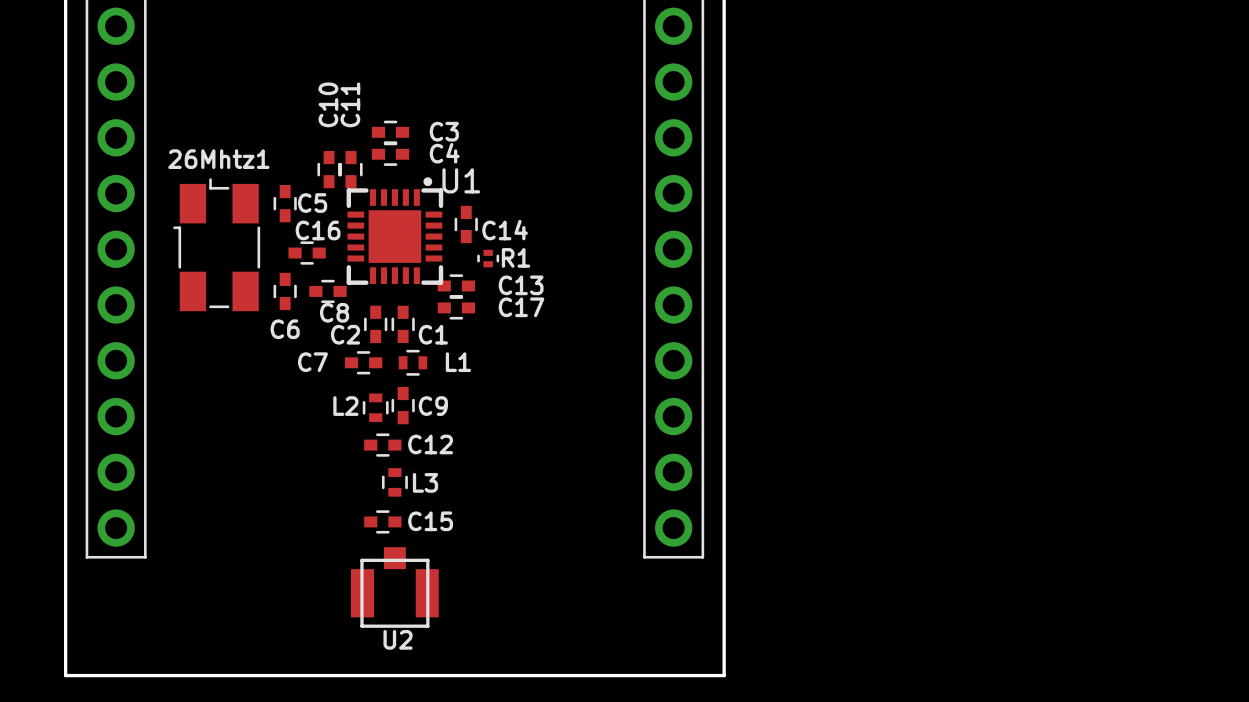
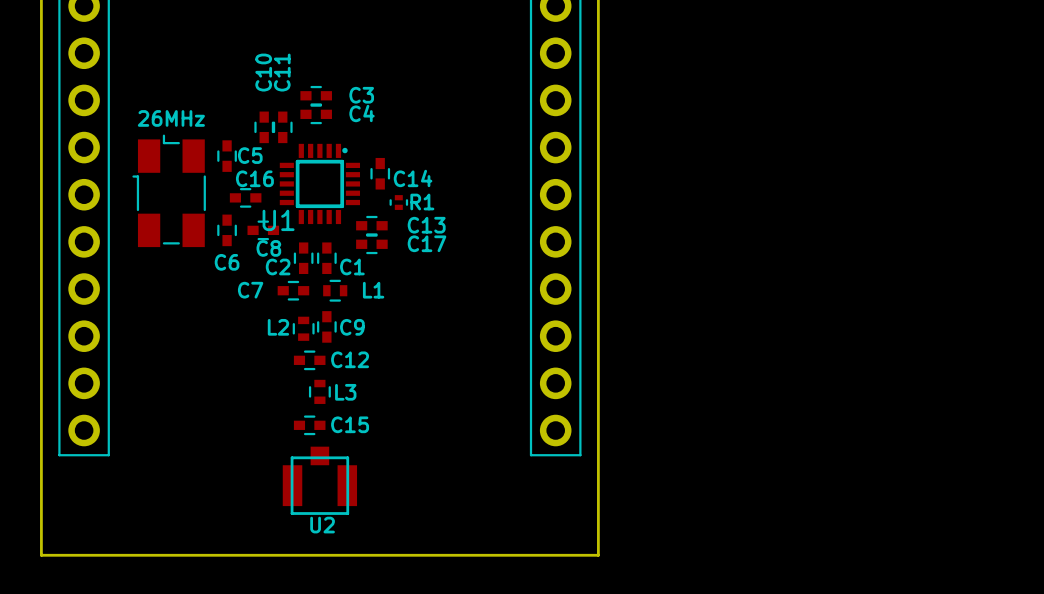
26Mhtz1 name: 26Mhtz1 (218, 159) -> 26MHz (171, 118)
U1 footprint: [346, 177, 444, 285] -> [279, 143, 361, 225]
U1 name position: U1 (461, 180) -> U1 (278, 220)

